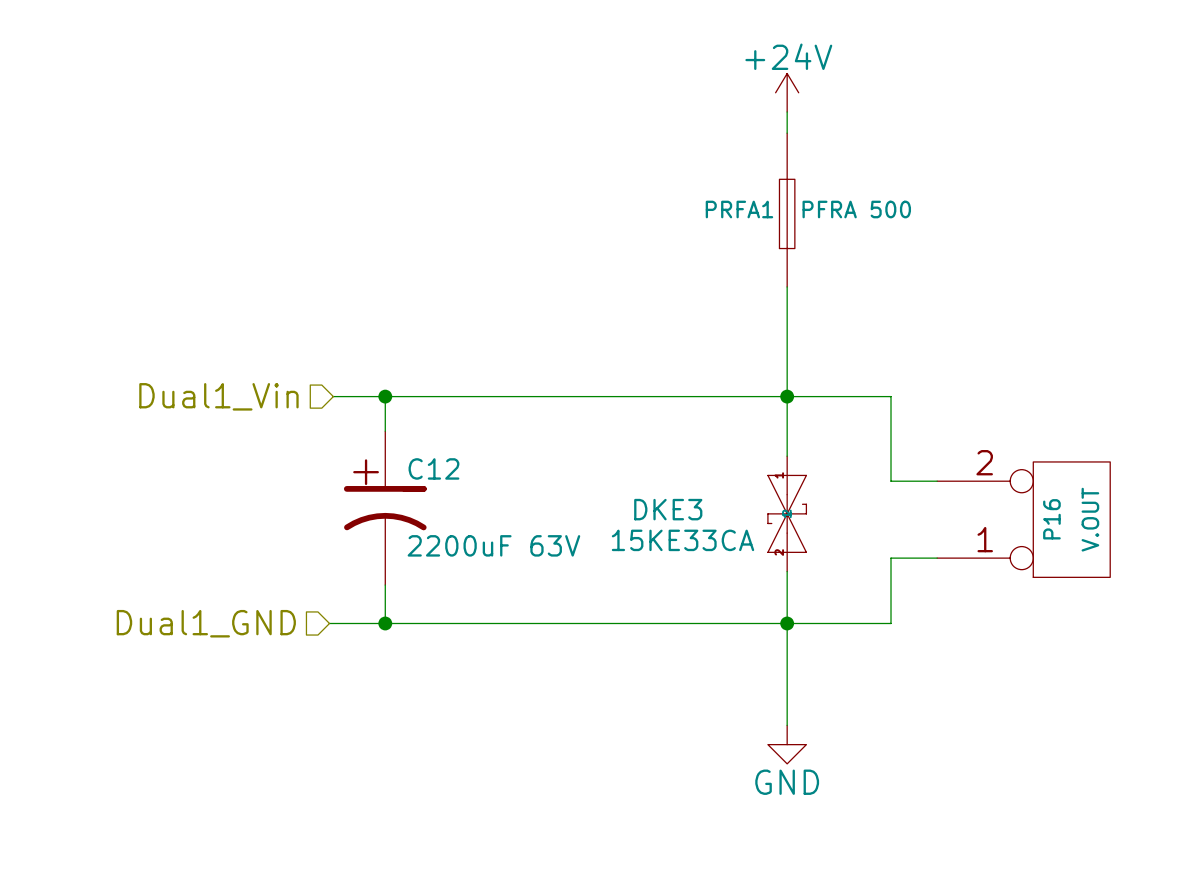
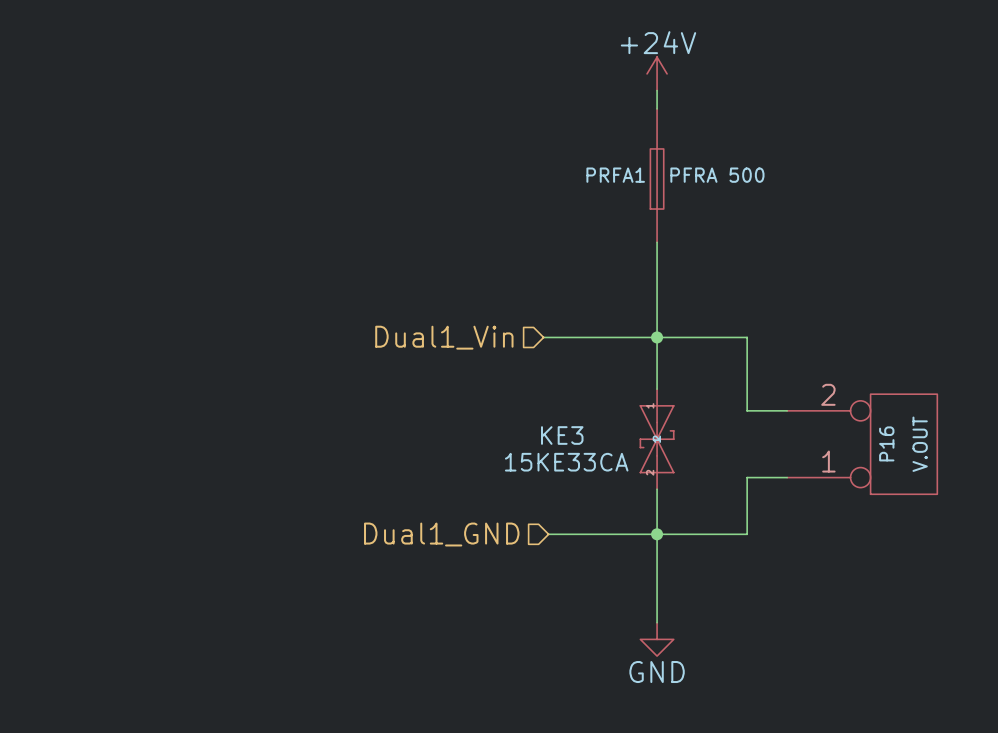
hierarchical label position: Dual1_Vin (218, 396) -> Dual1_Vin (444, 337)
wire: (333, 396) (656, 396) -> none
wire: (385, 396) (385, 431) -> none
junction: (385, 396) -> none
C12: 2200uF 63V (385, 508) -> none
DKE3 name: DKE3 (668, 509) -> KE3 (562, 435)
wire: (385, 585) (385, 623) -> none
hierarchical label position: Dual1_GND (206, 623) -> Dual1_GND (441, 534)
wire: (329, 623) (662, 623) -> none
junction: (385, 623) -> none

